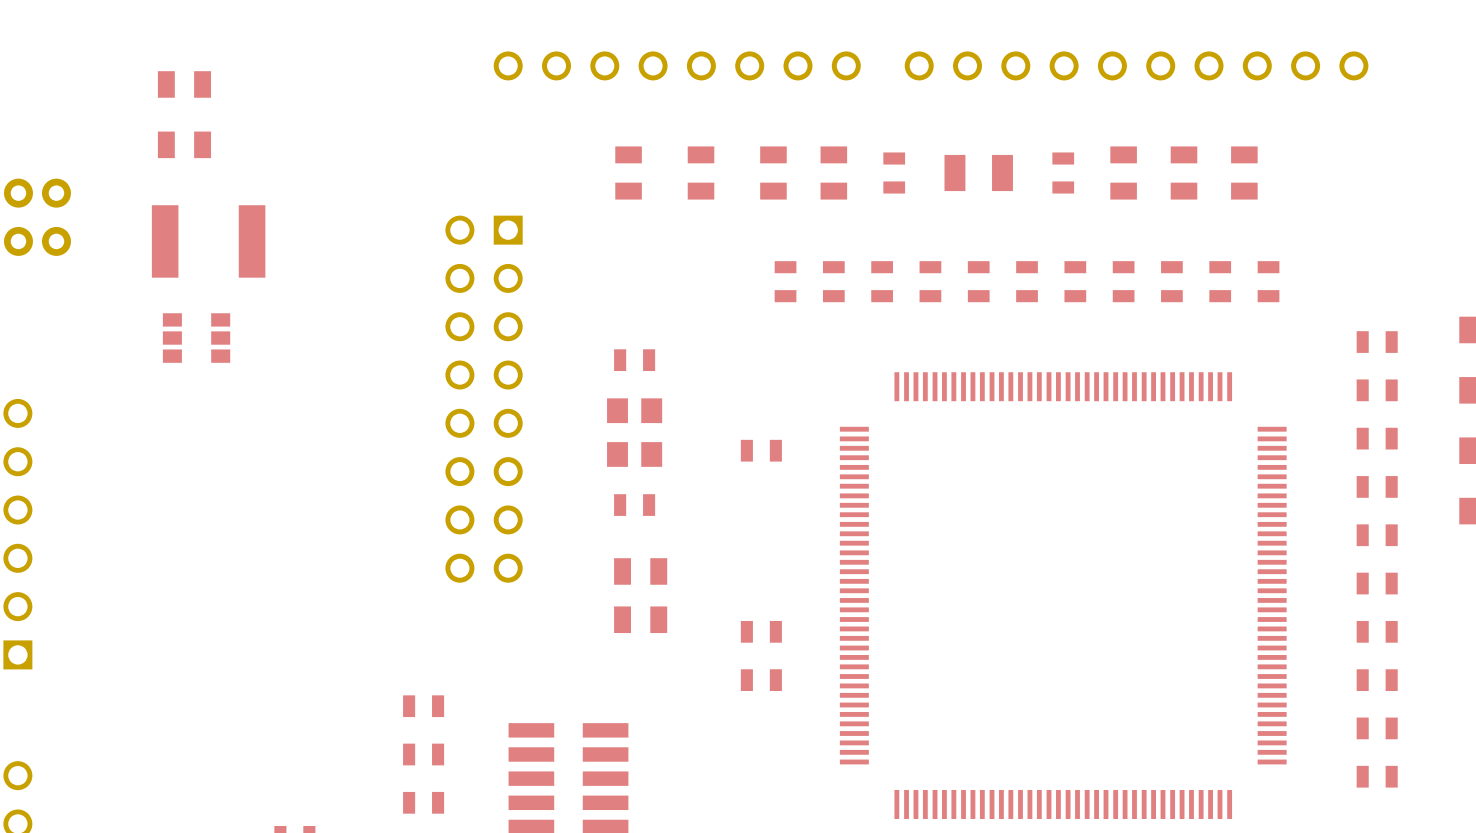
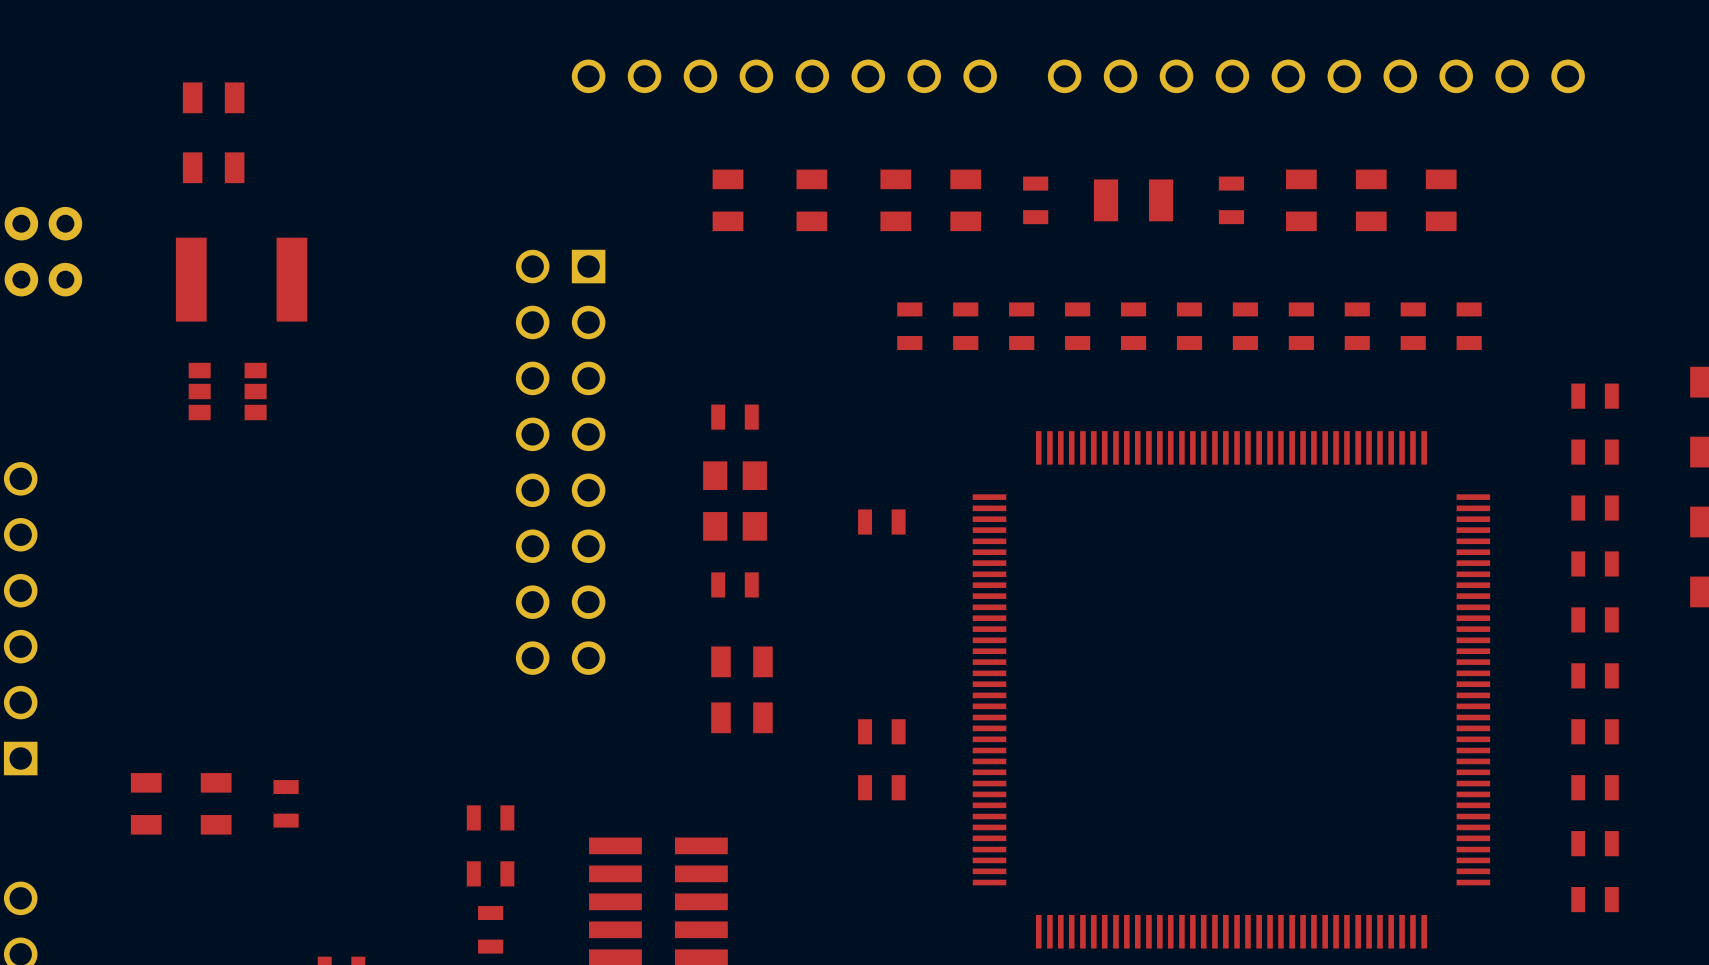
part: none -> (146, 803)
part: none -> (216, 803)
part: none -> (286, 803)
part rotation: 0° (423, 802) -> 90° clockwise (490, 929)

